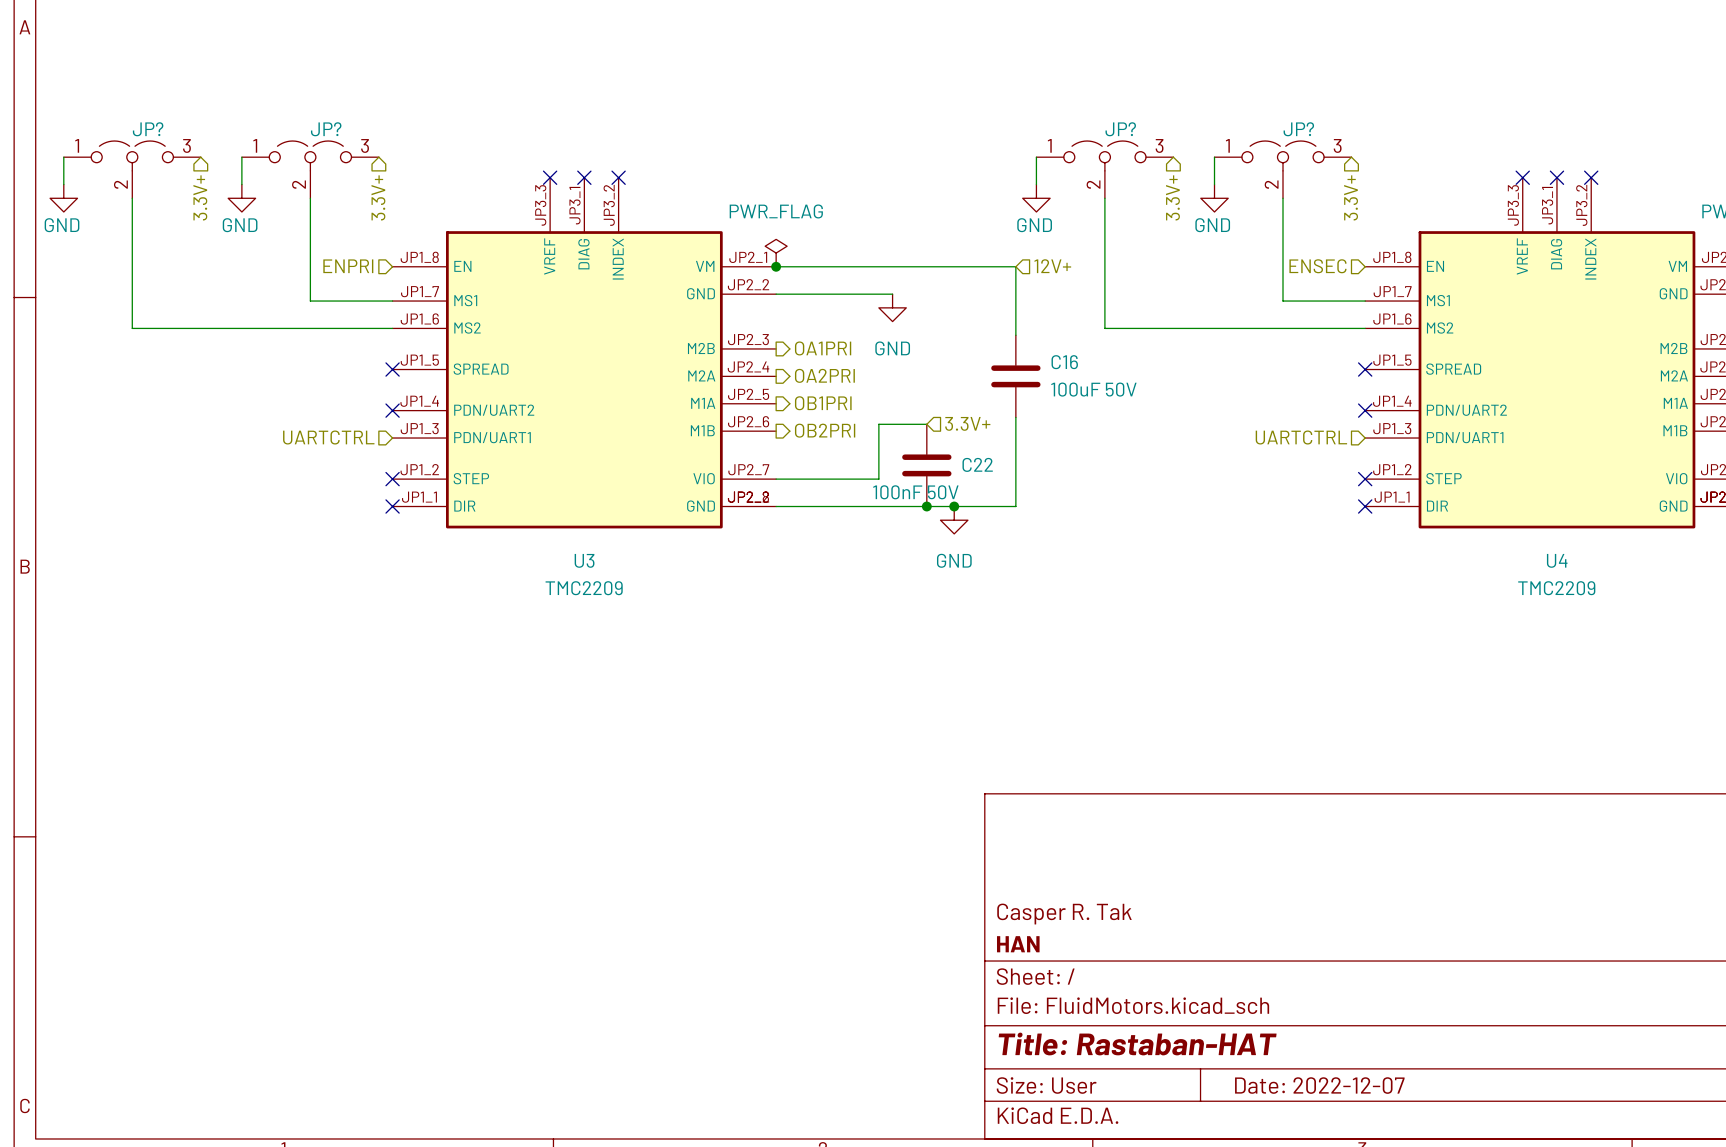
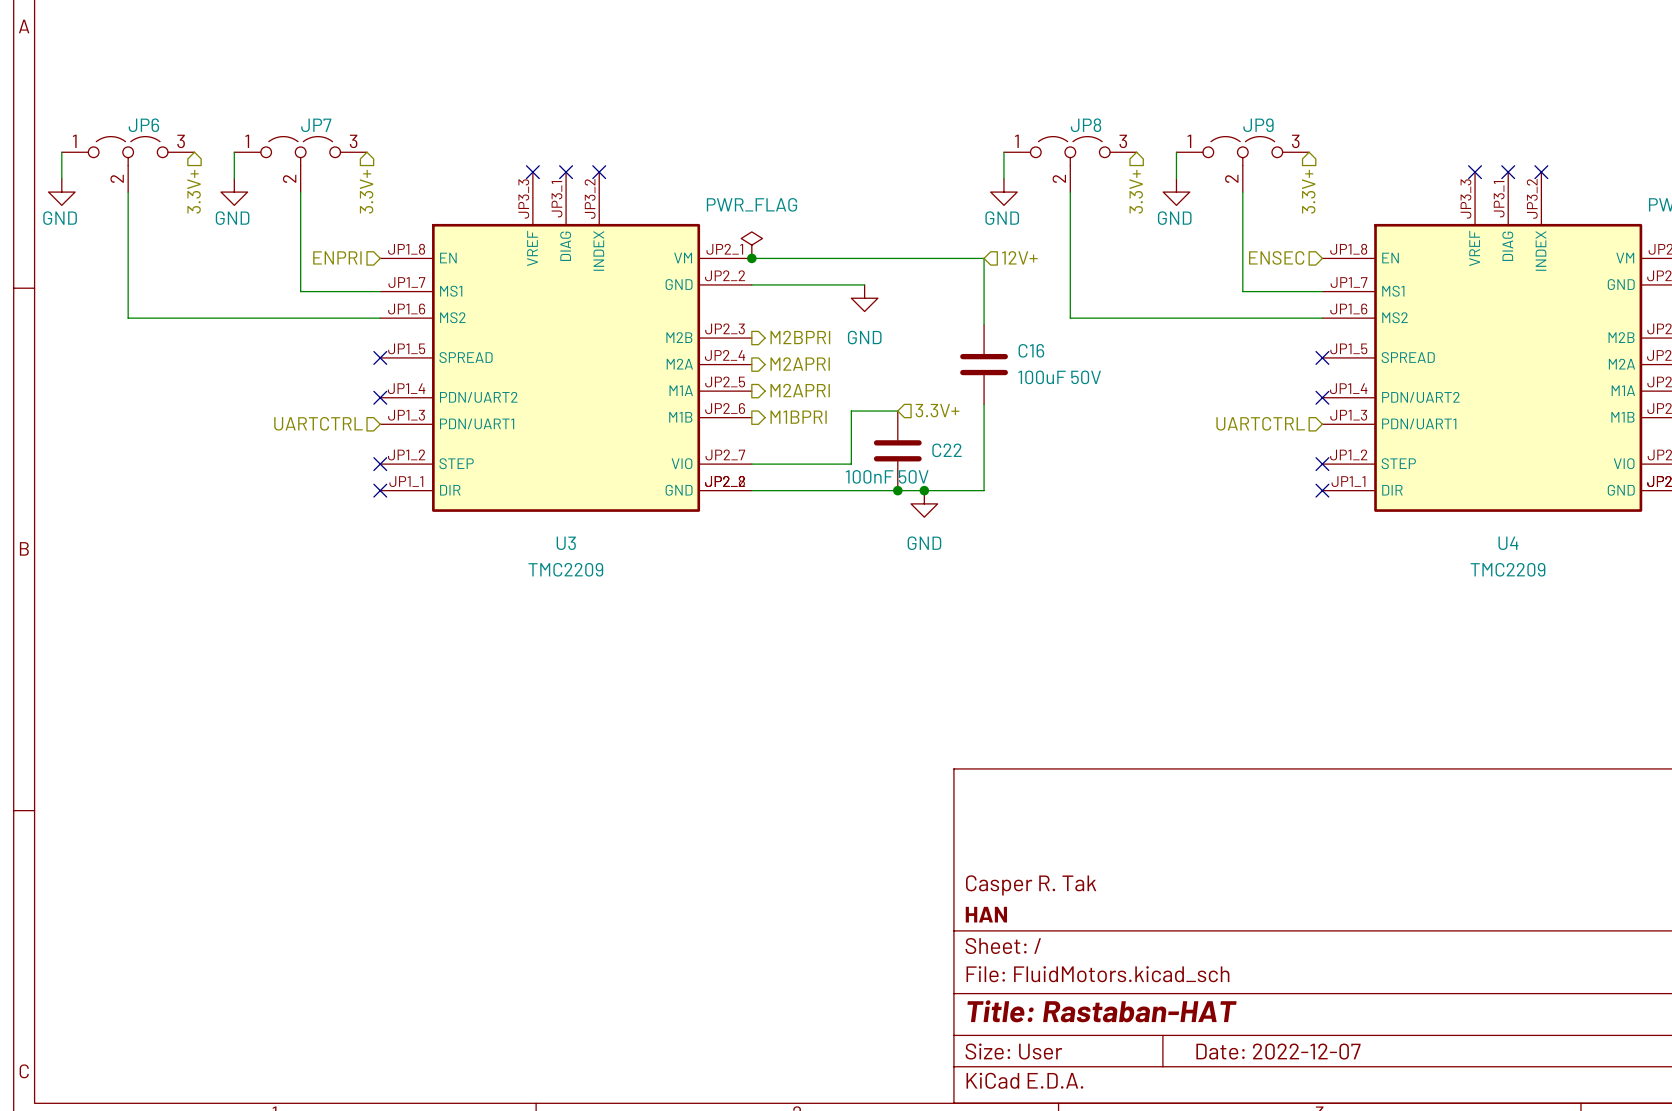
JP? name: JP? (148, 129) -> JP6 (143, 125)
JP? name: JP? (326, 129) -> JP7 (316, 125)
JP? name: JP? (1120, 129) -> JP8 (1086, 125)
JP? name: JP? (1298, 129) -> JP9 (1258, 125)
hierarchical label: OA1PRI (823, 348) -> M2BPRI (800, 337)
hierarchical label: OA2PRI (824, 375) -> M2APRI (800, 364)
hierarchical label: OB1PRI (823, 403) -> M2APRI (800, 390)
hierarchical label: OB2PRI (825, 430) -> M1BPRI (798, 417)

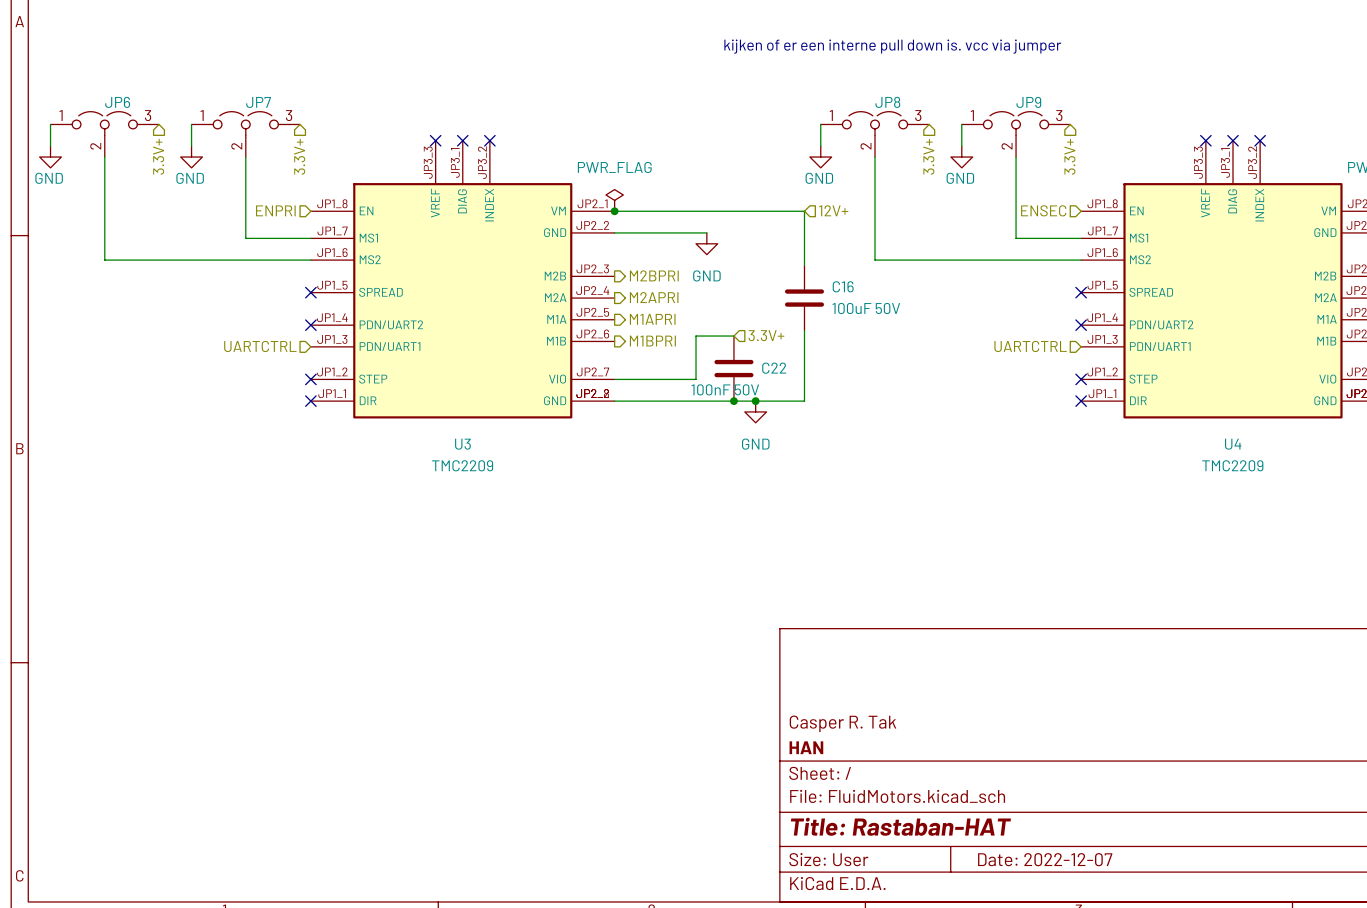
text: none -> kijken of er een interne pull down is. vcc via jumper (892, 46)
hierarchical label: M2APRI (800, 390) -> M1APRI (652, 319)

